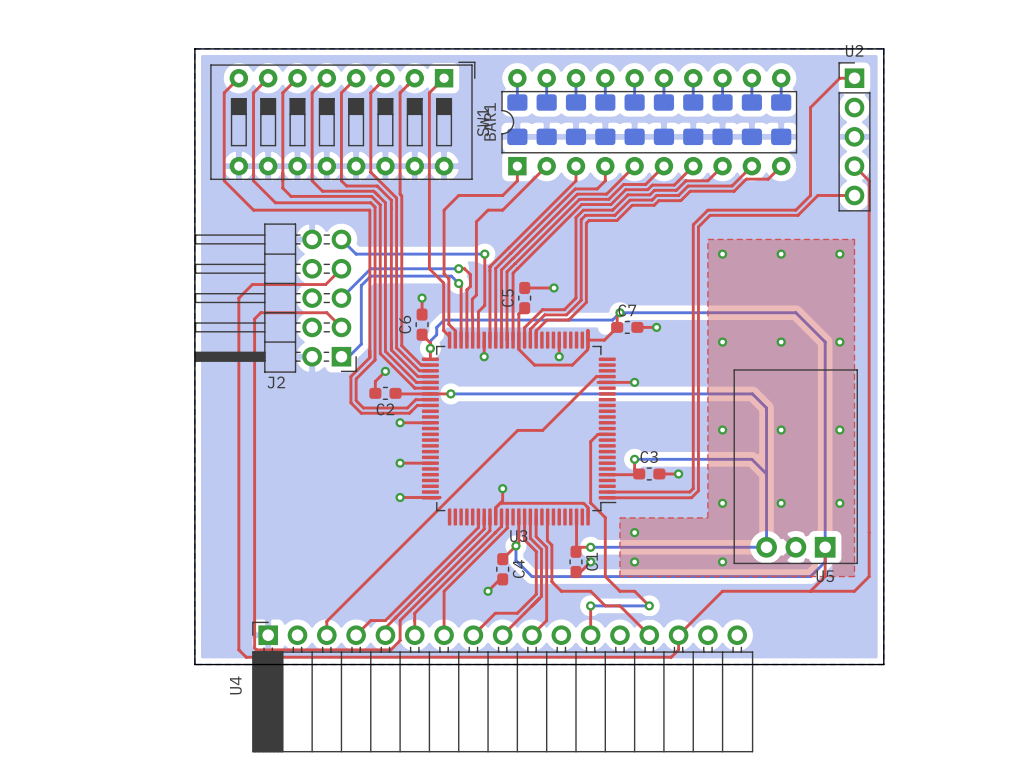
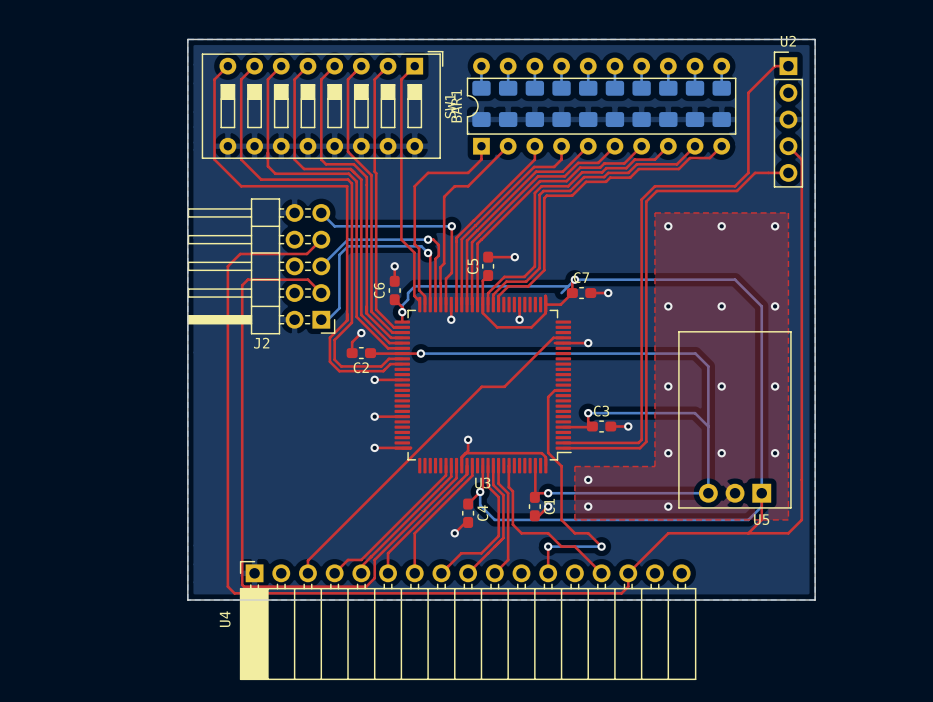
bottom track: none -> (568, 286) (561, 293)

